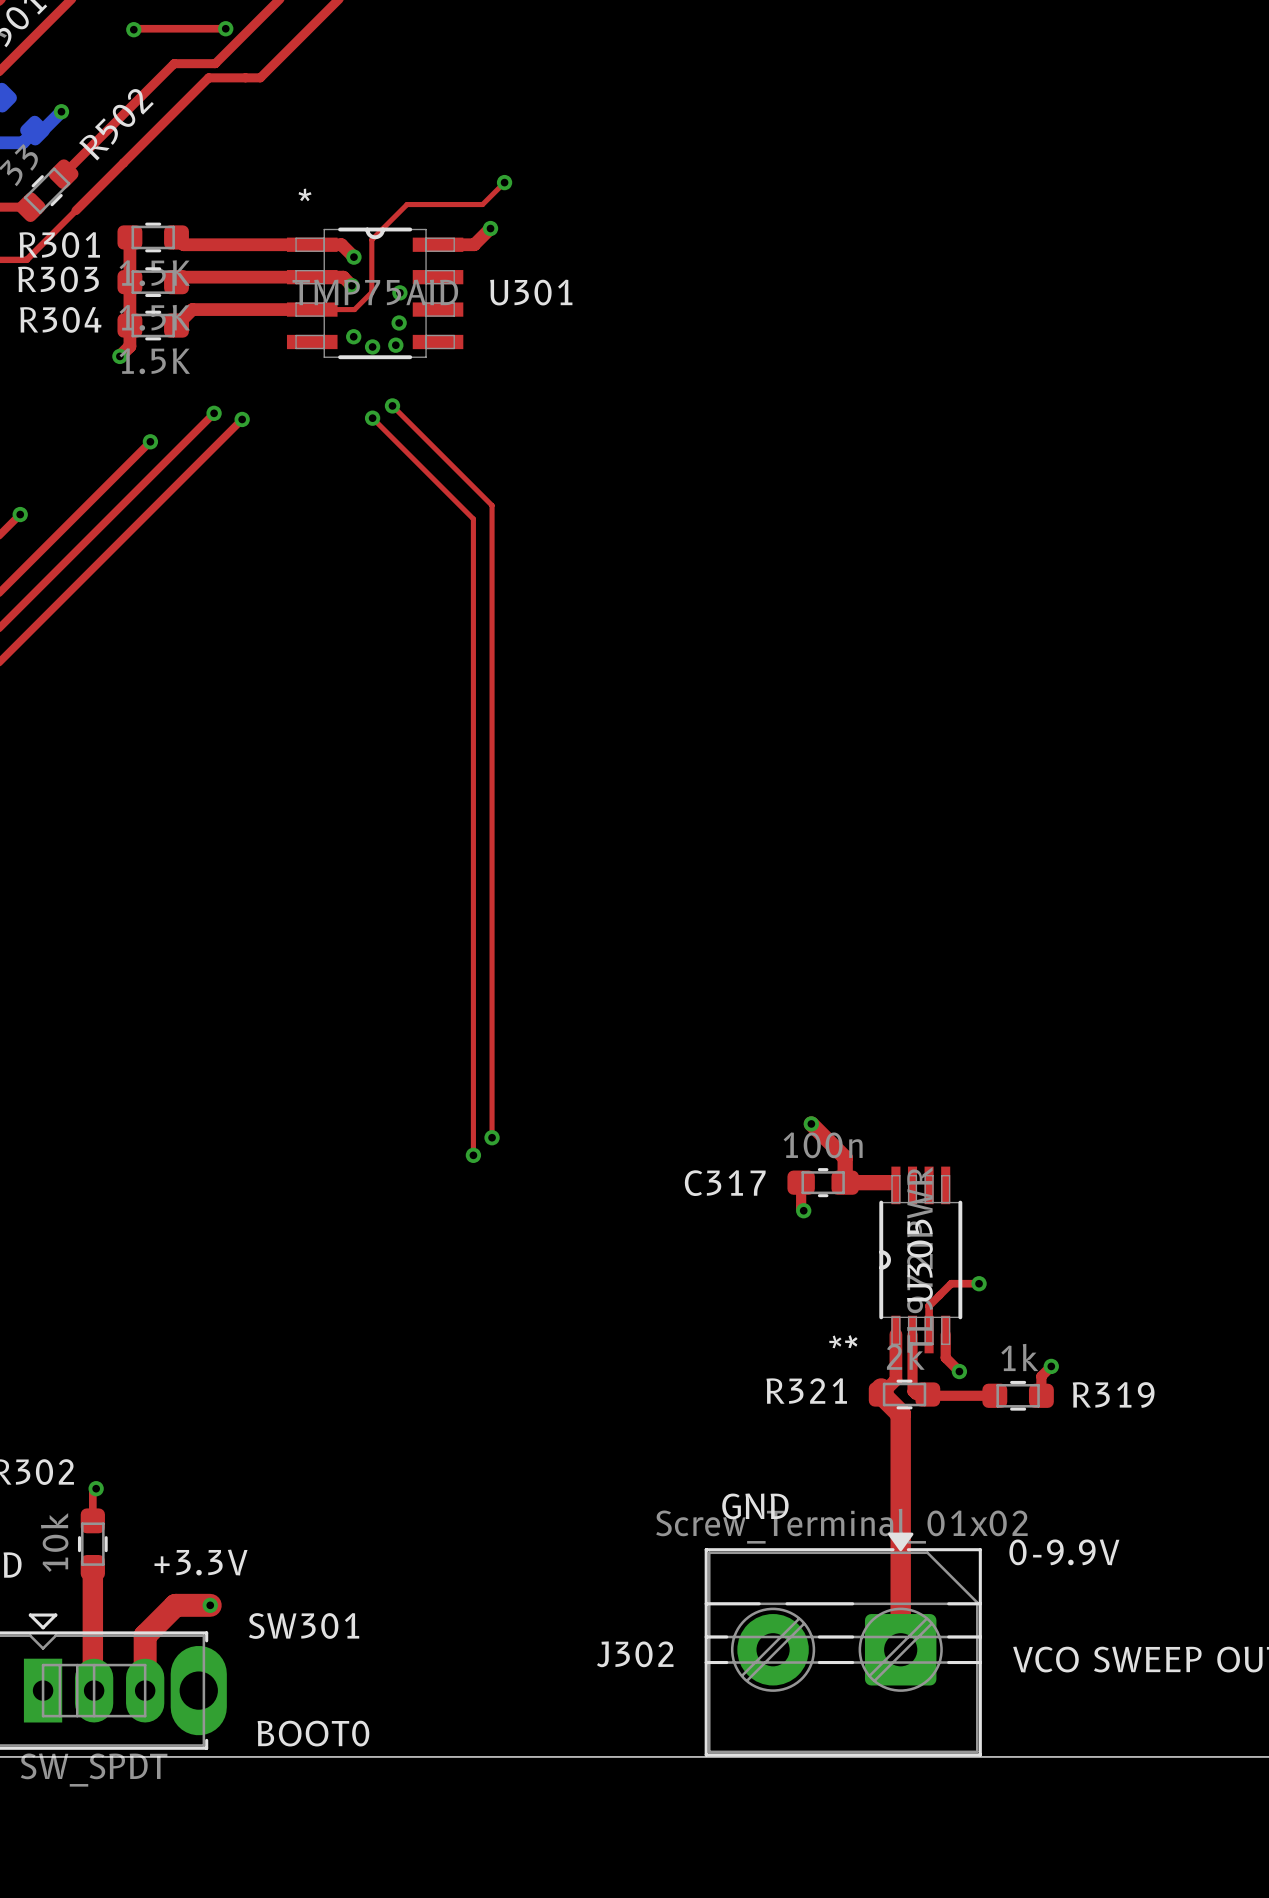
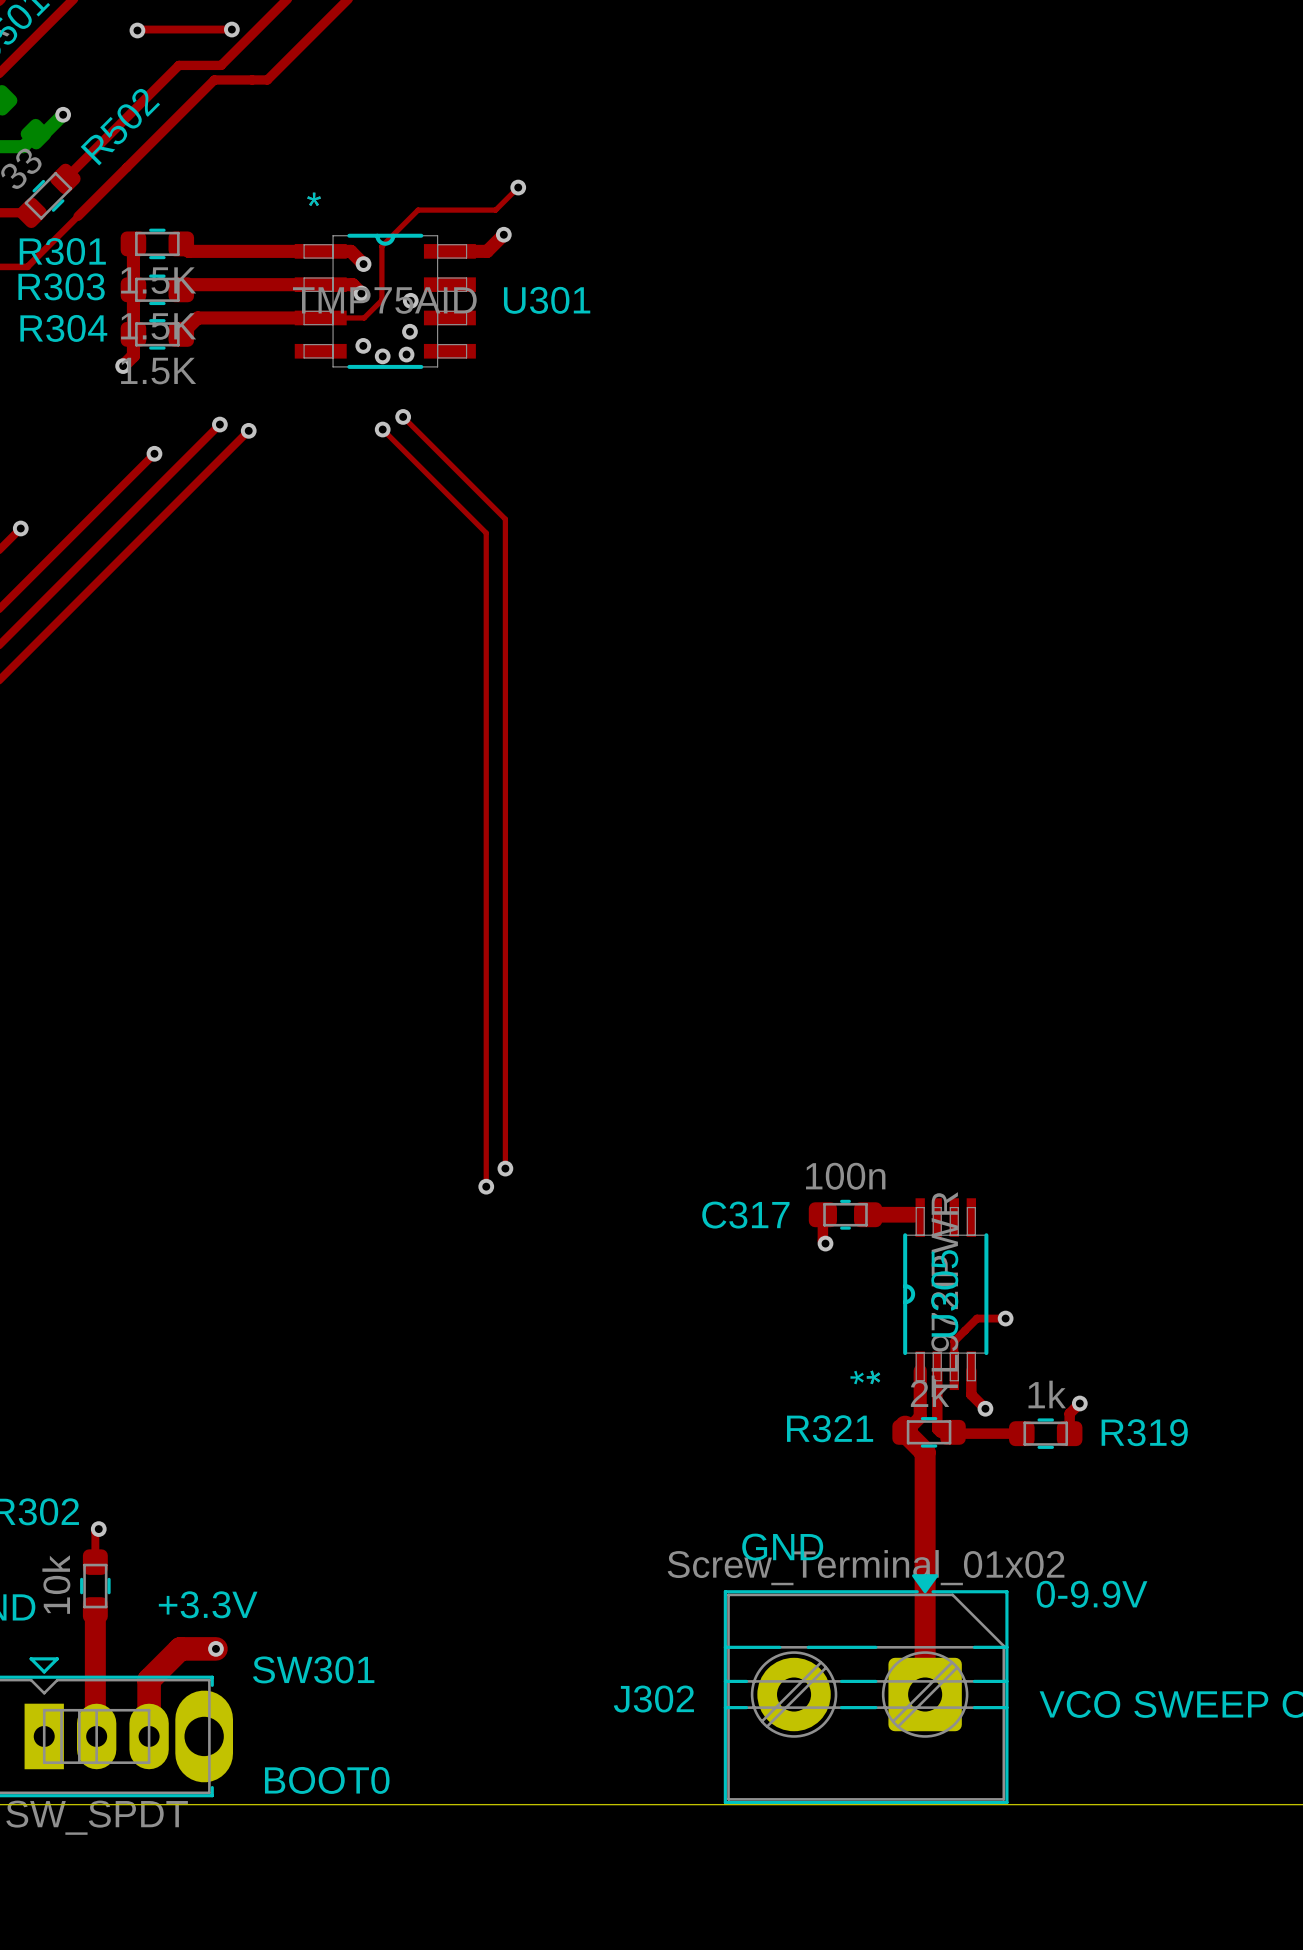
top track: (811, 1123) (845, 1157) (845, 1182) -> none
via: (811, 1123) -> none

